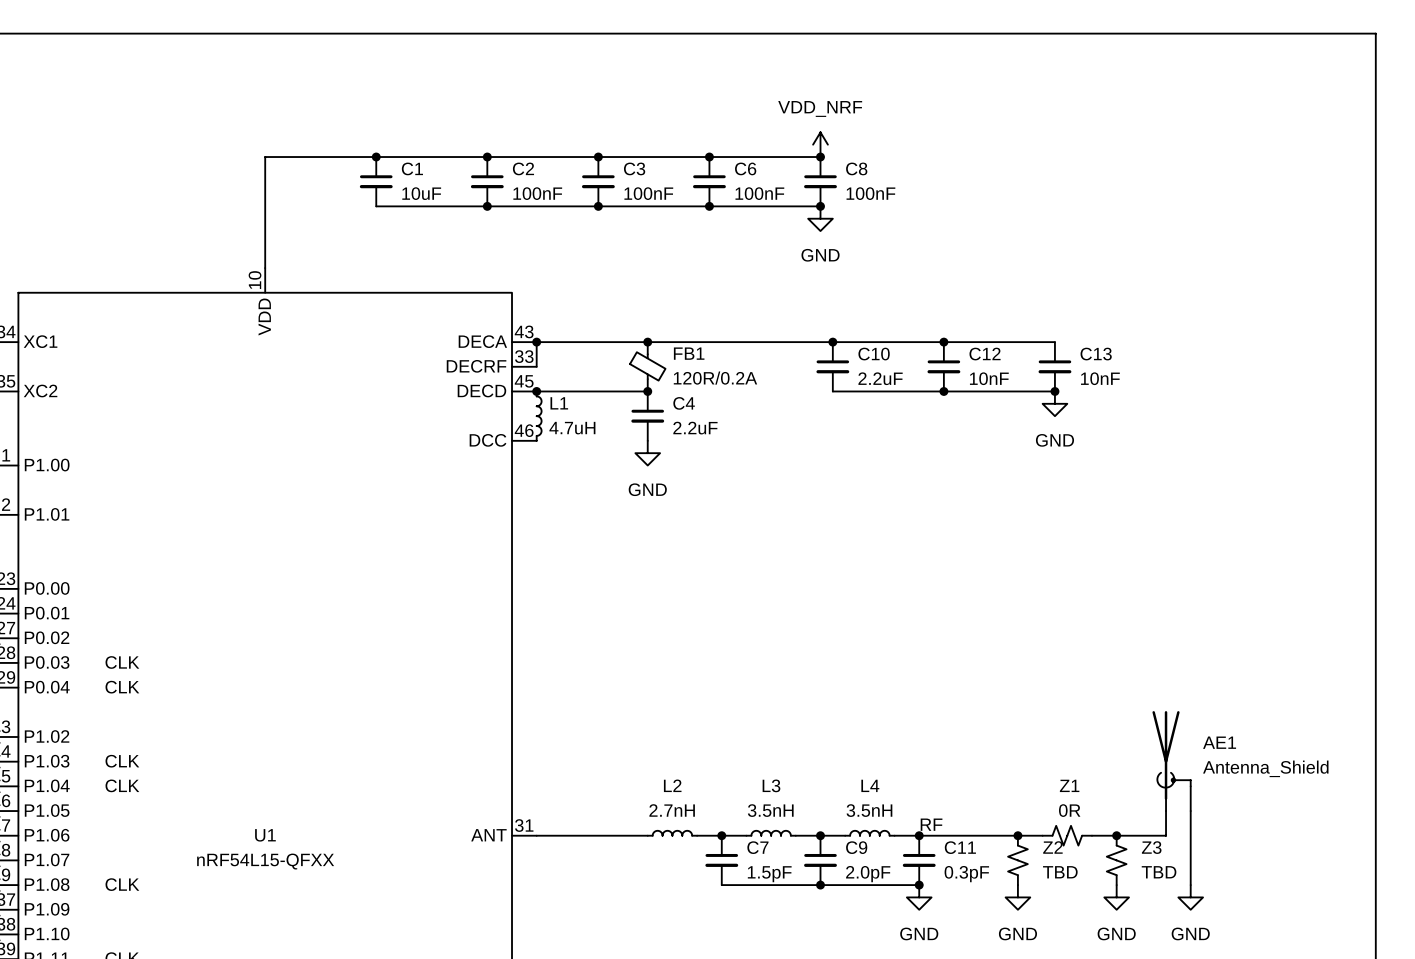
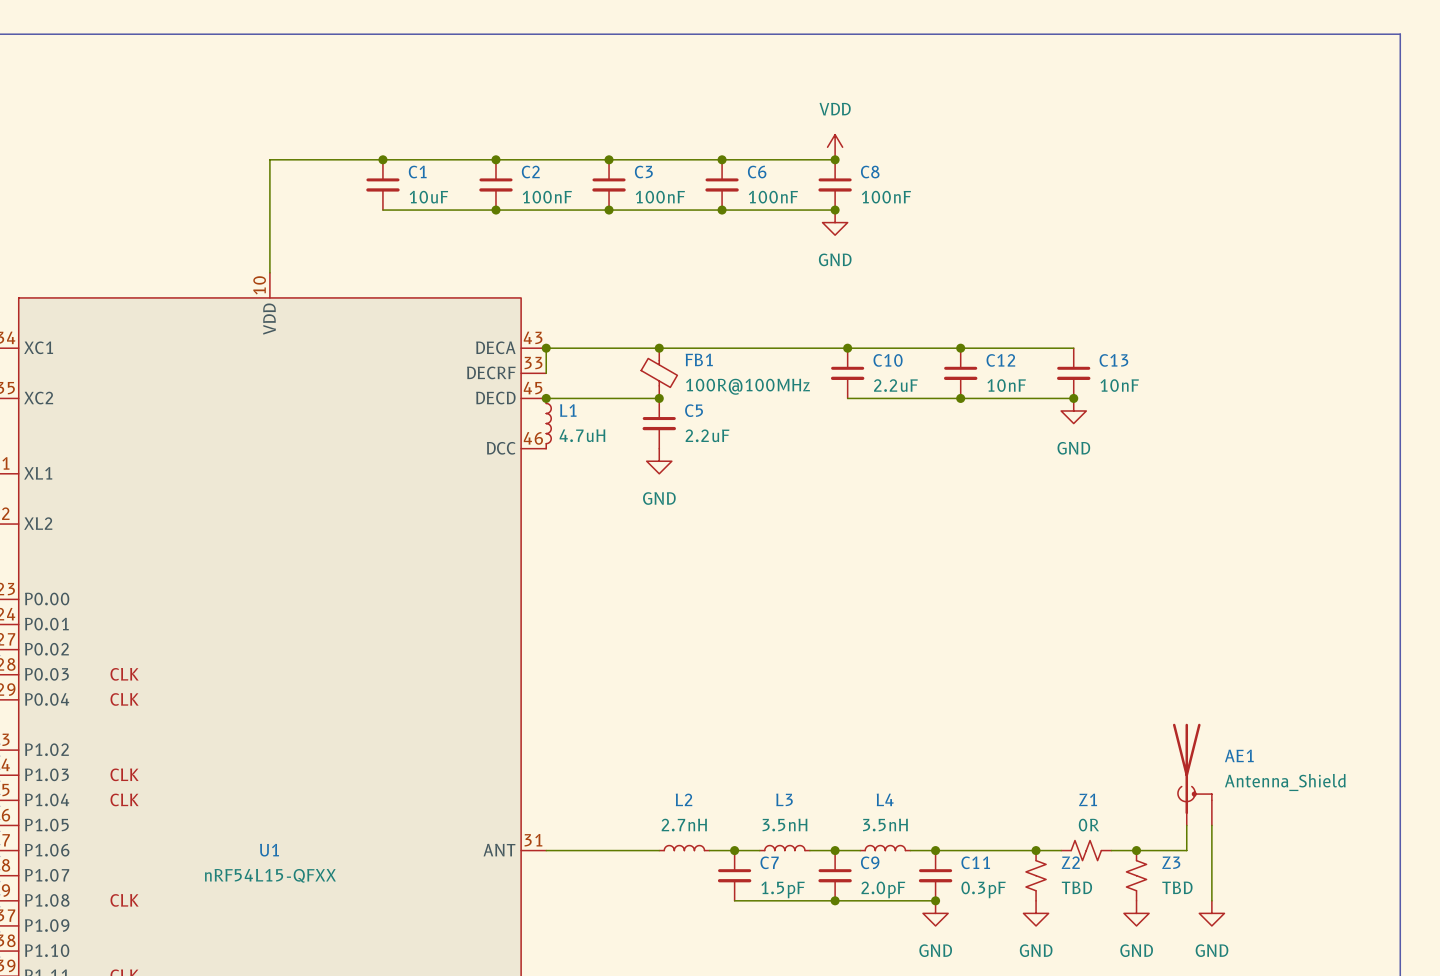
power symbol: VDD_NRF (820, 144) -> VDD (835, 147)
FB1 value: 120R/0.2A (715, 378) -> 100R@100MHz (747, 386)
C4 name: C4 (684, 403) -> C5 (694, 410)
U1 pin name: P1.00 (47, 465) -> XL1 (38, 473)
U1 pin name: P1.01 (47, 514) -> XL2 (38, 523)
label: RF (931, 824) -> none

